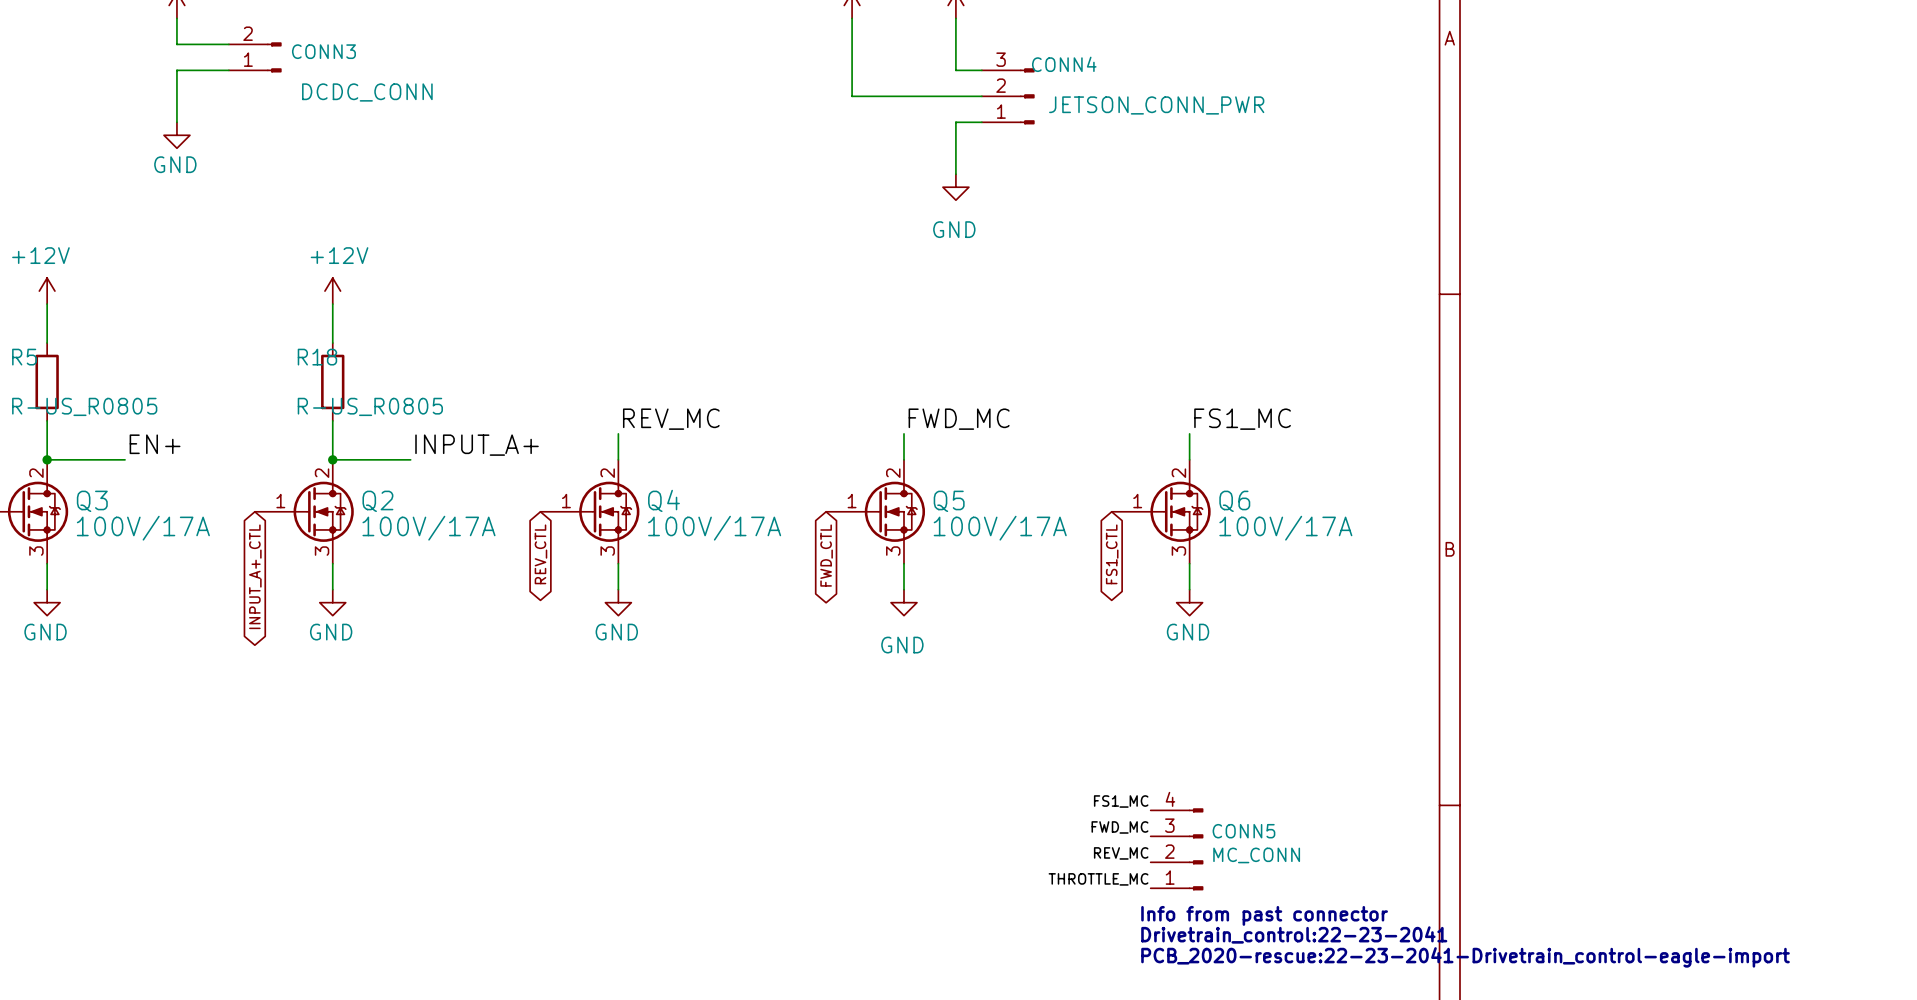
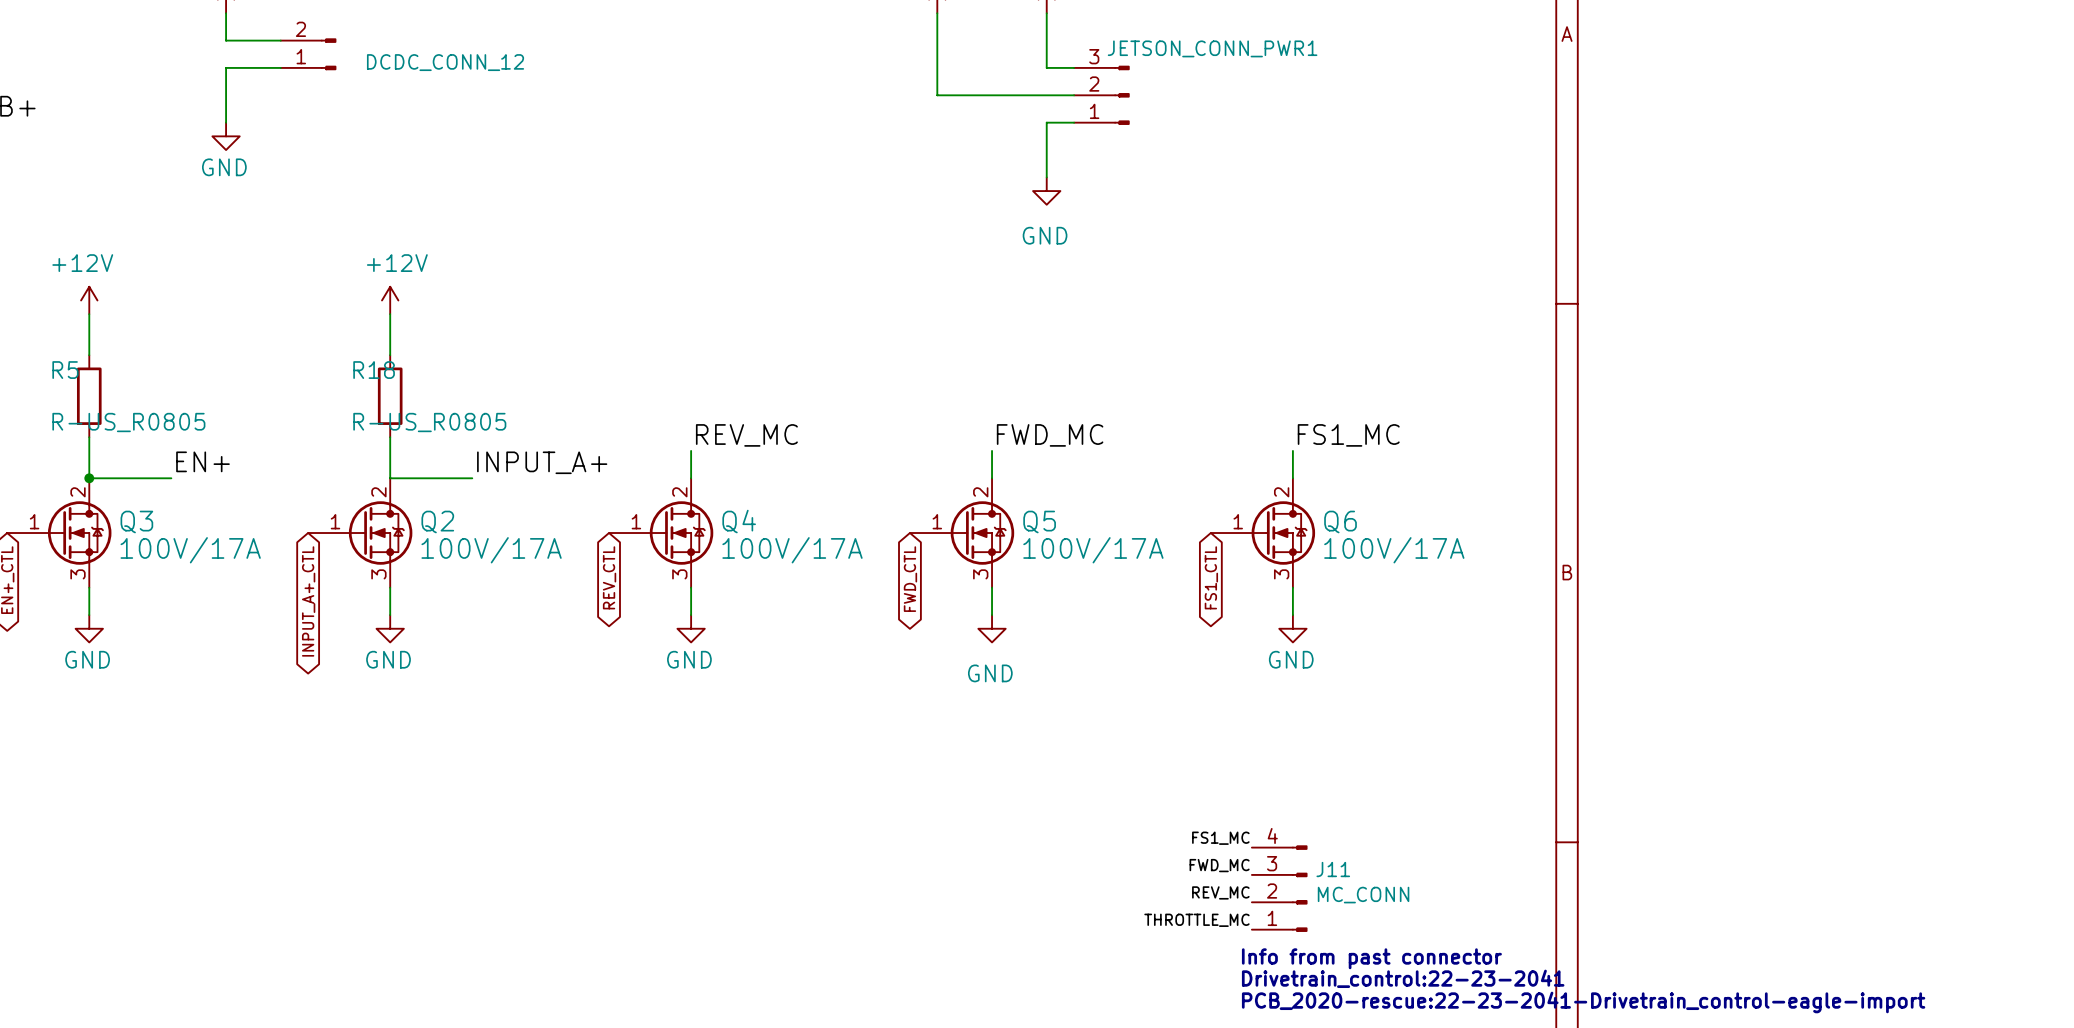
CONN3 name: CONN3 (323, 51) -> DCDC_CONN_12 (445, 62)
CONN4 name: CONN4 (1064, 64) -> JETSON_CONN_PWR1 (1212, 48)
CONN3 value: DCDC_CONN (367, 92) -> none
CONN4 value: JETSON_CONN_PWR (1156, 105) -> none
junction: (332, 459) -> none
CONN5 name: CONN5 (1243, 831) -> J11 (1333, 869)

